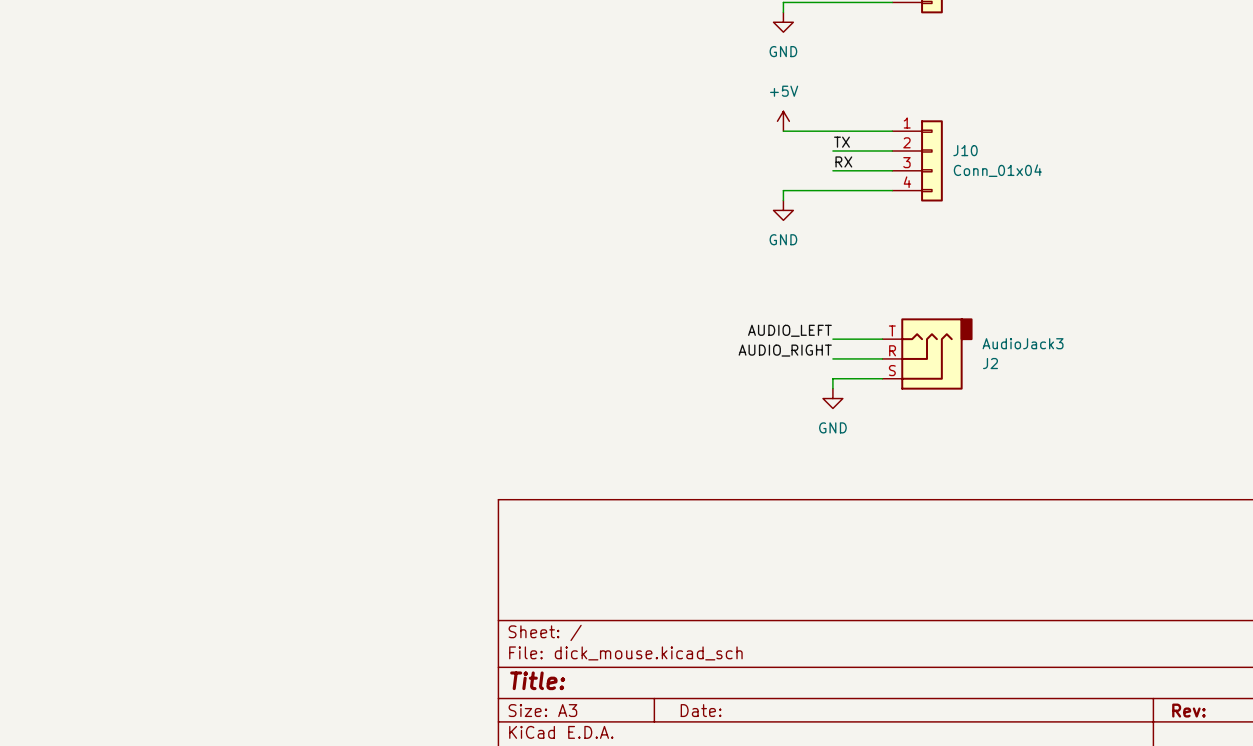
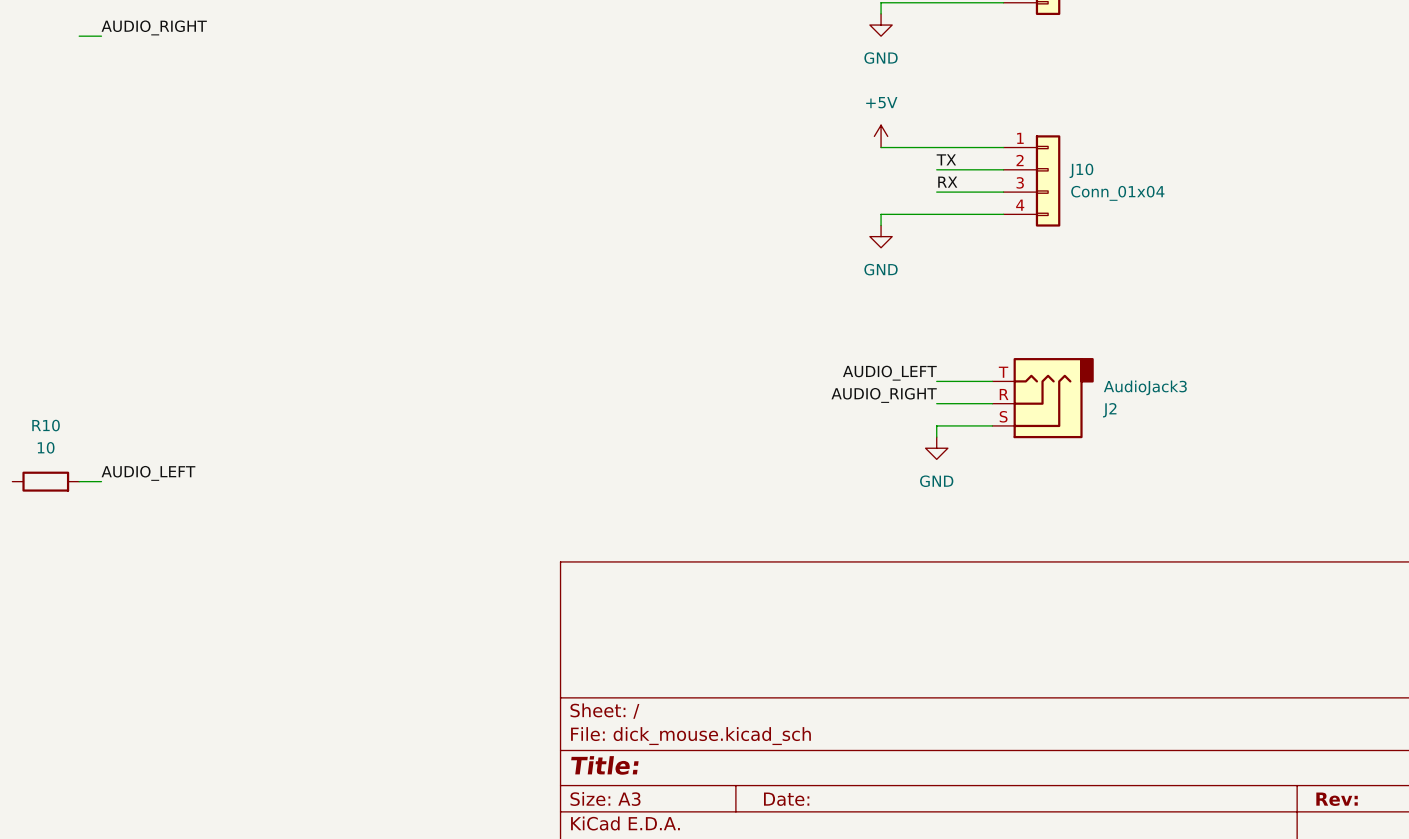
label: none -> AUDIO_RIGHT (154, 27)
wire: none -> (79, 36) (101, 36)
label: none -> AUDIO_LEFT (148, 473)
R10: none -> 10 (45, 481)
wire: none -> (79, 481) (101, 481)

